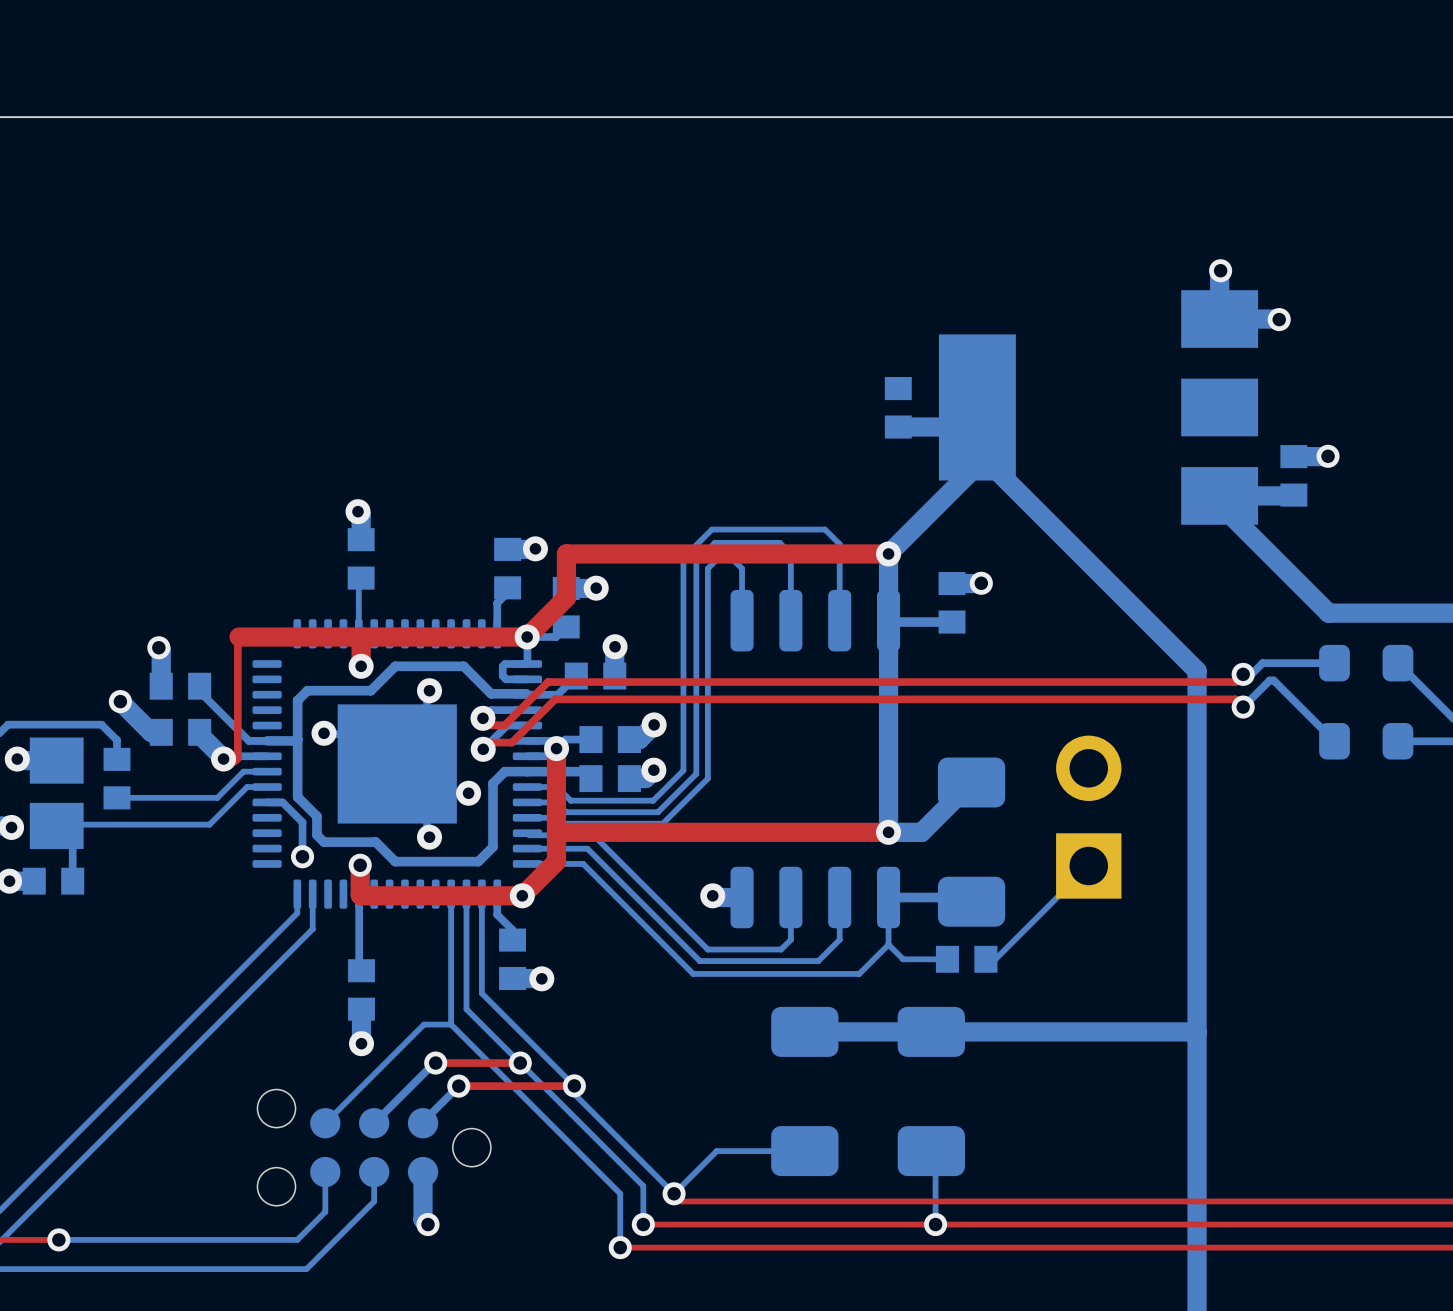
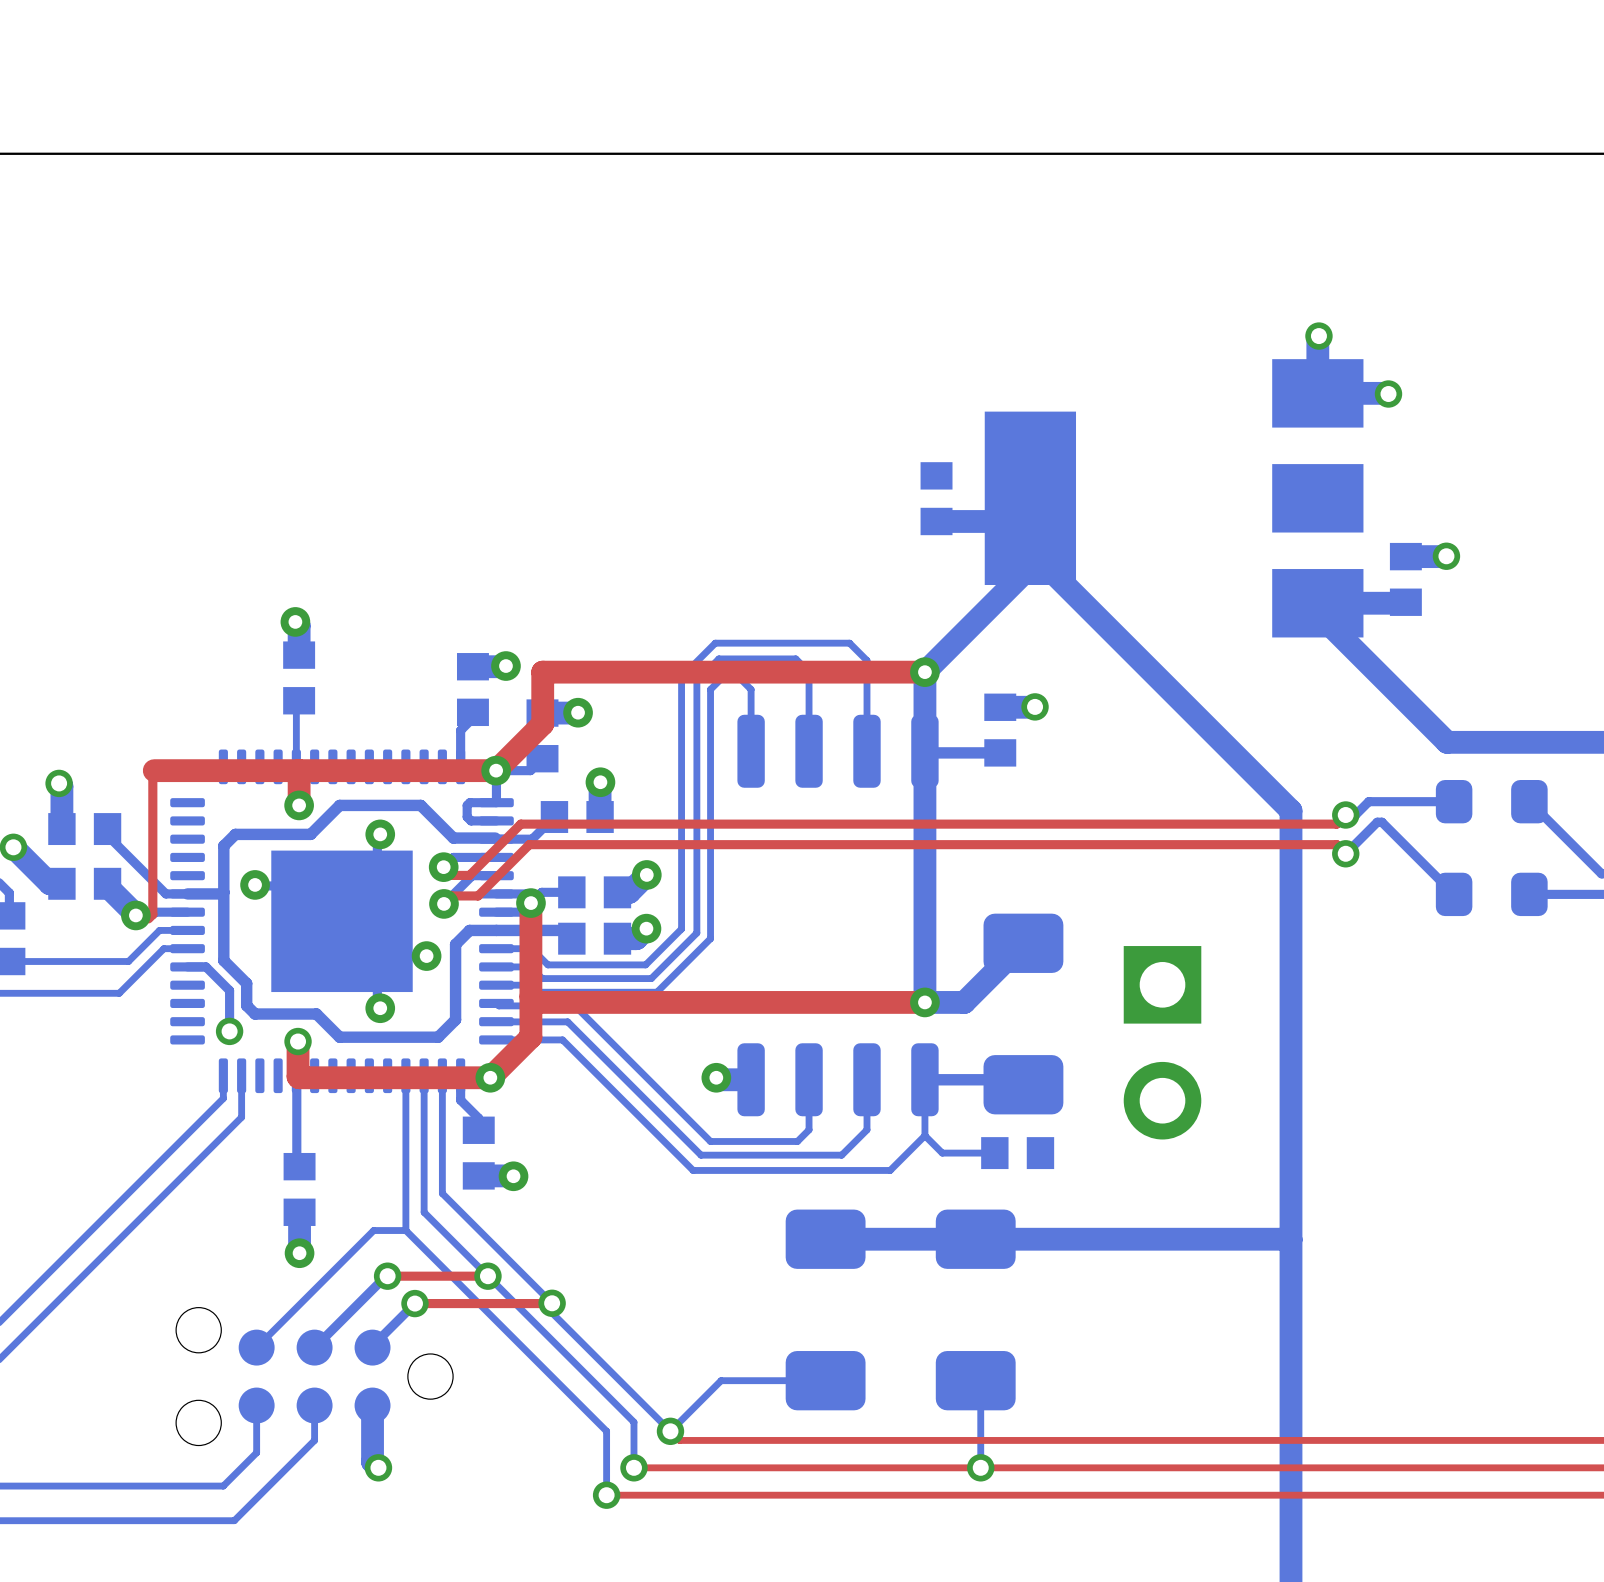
part rotation: 0° (1088, 817) -> 180° (1162, 1042)
bottom track: (1088, 865) (995, 959) (985, 959) -> none

